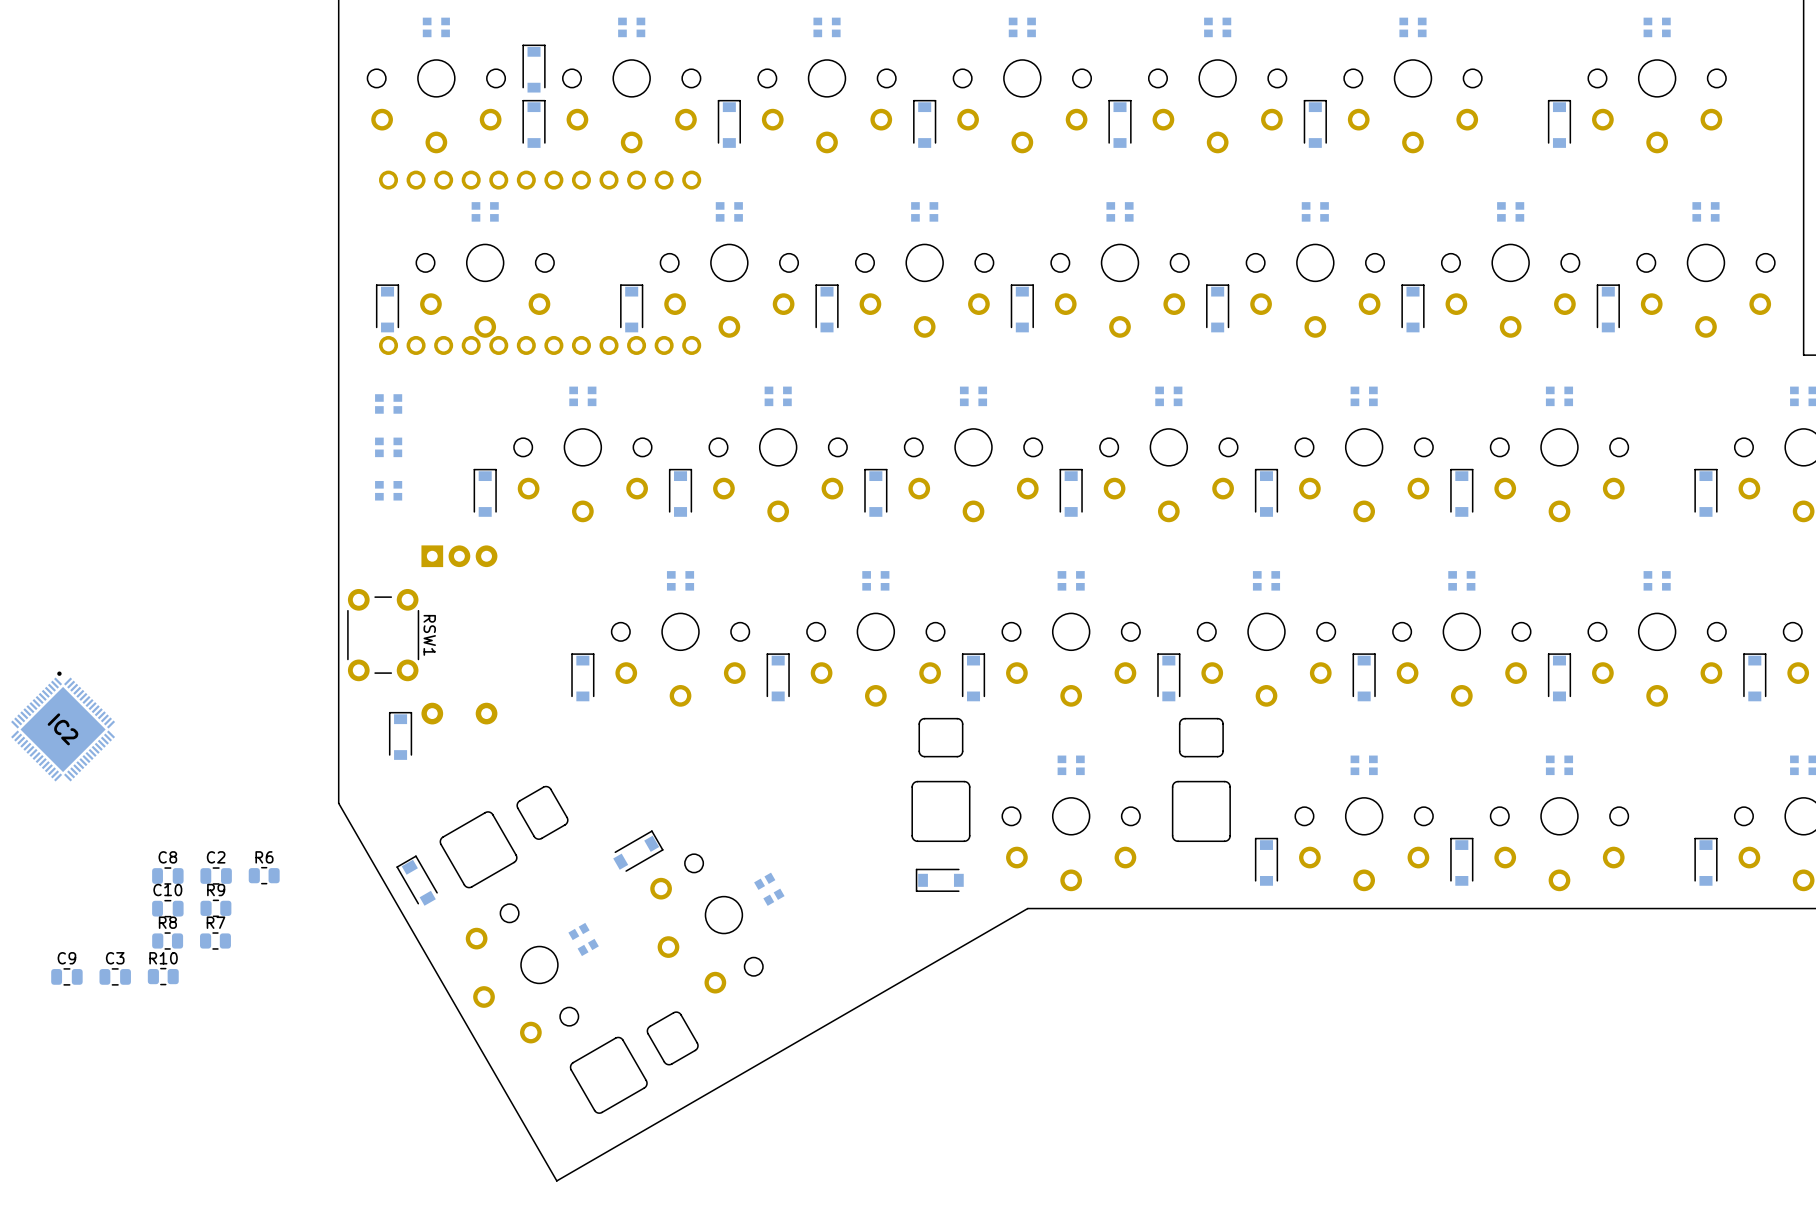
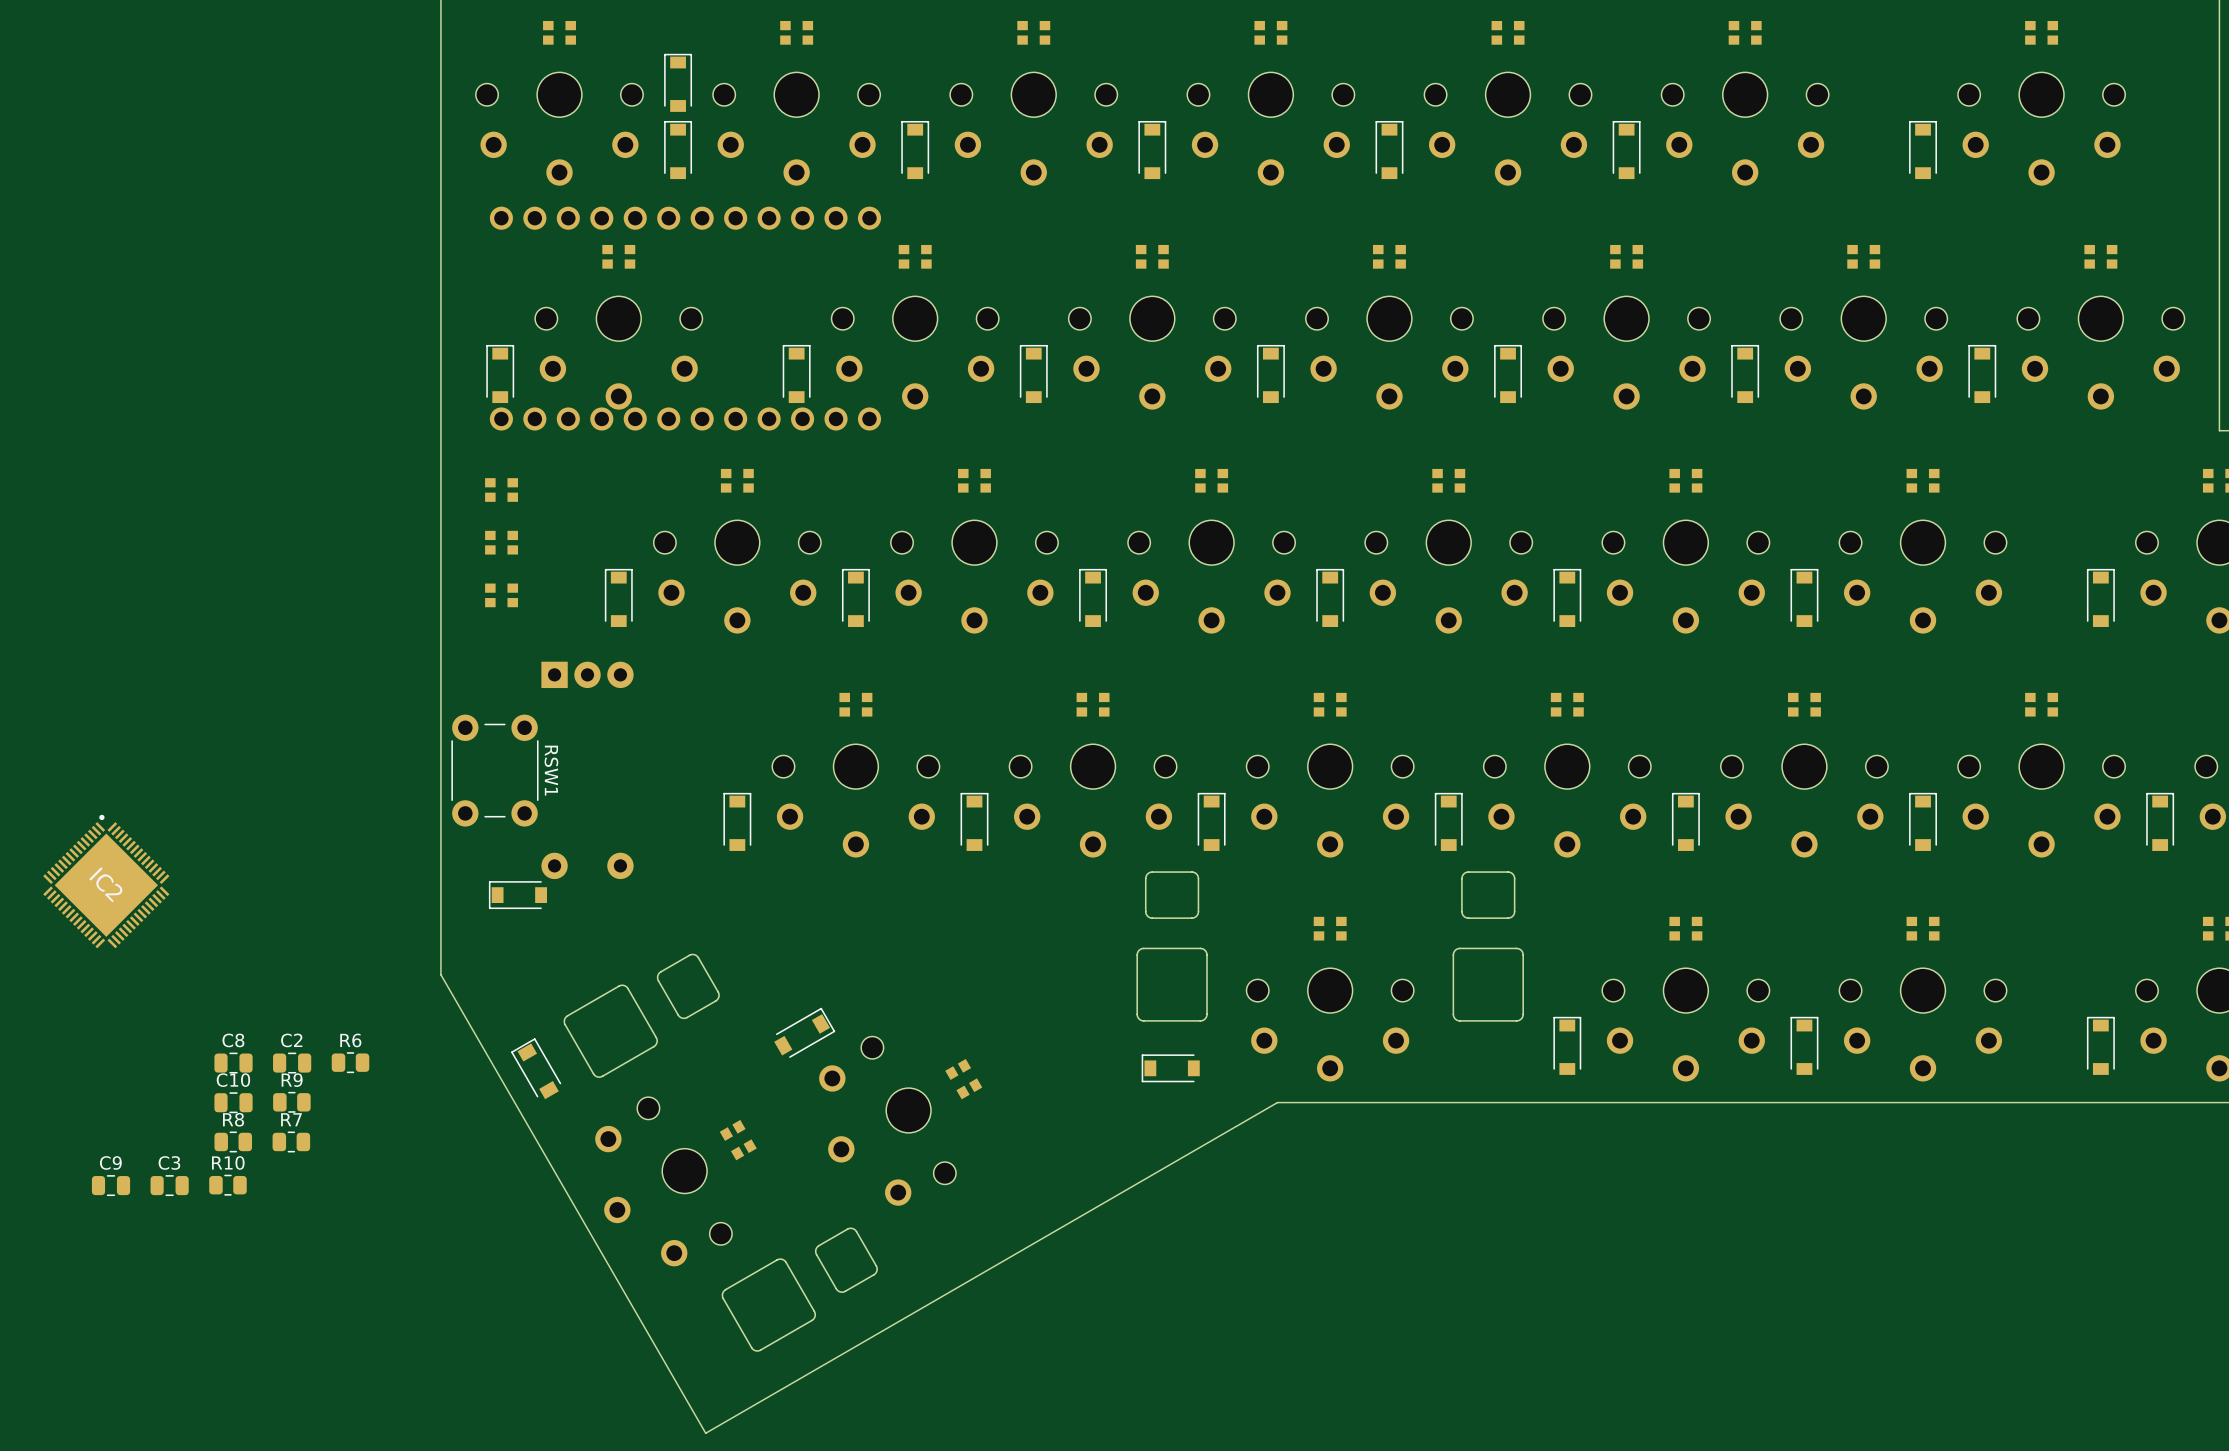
part rotation: 0° (400, 735) -> 90° counterclockwise (517, 895)

